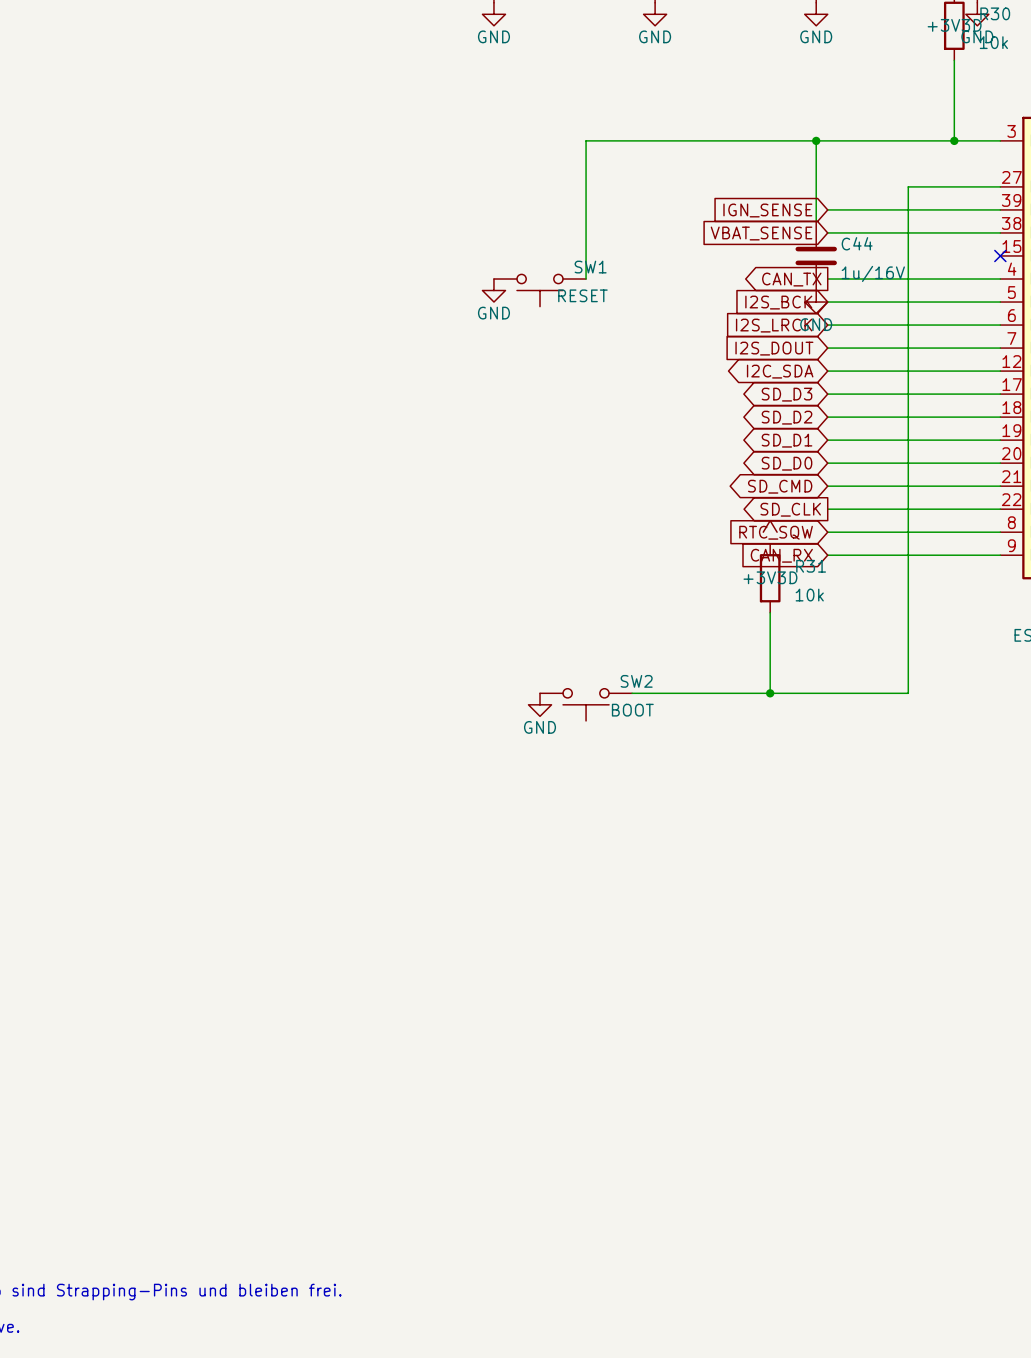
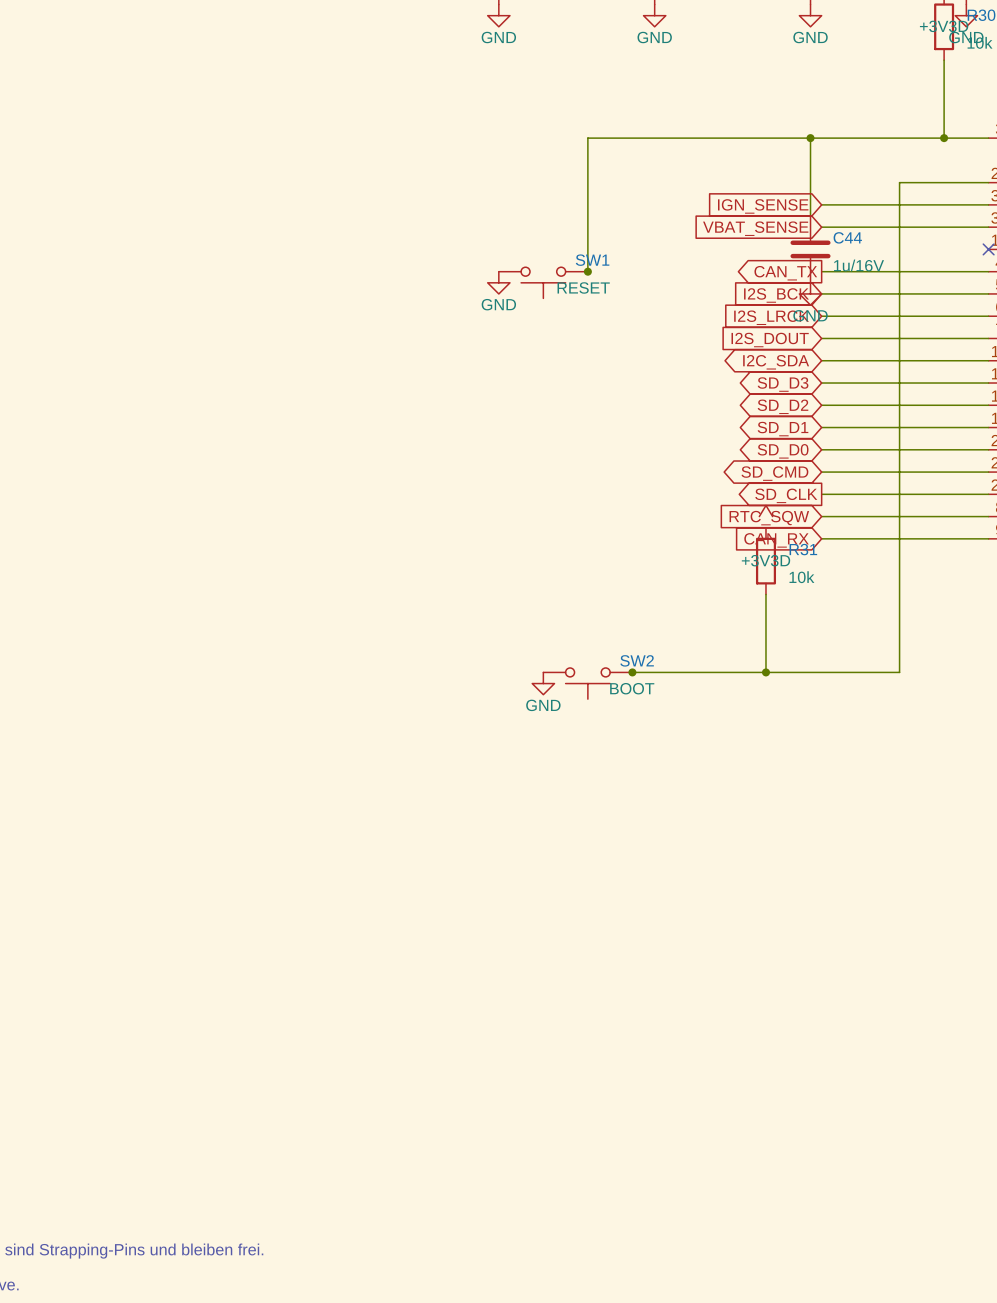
junction: none -> (587, 271)
junction: none -> (632, 672)

